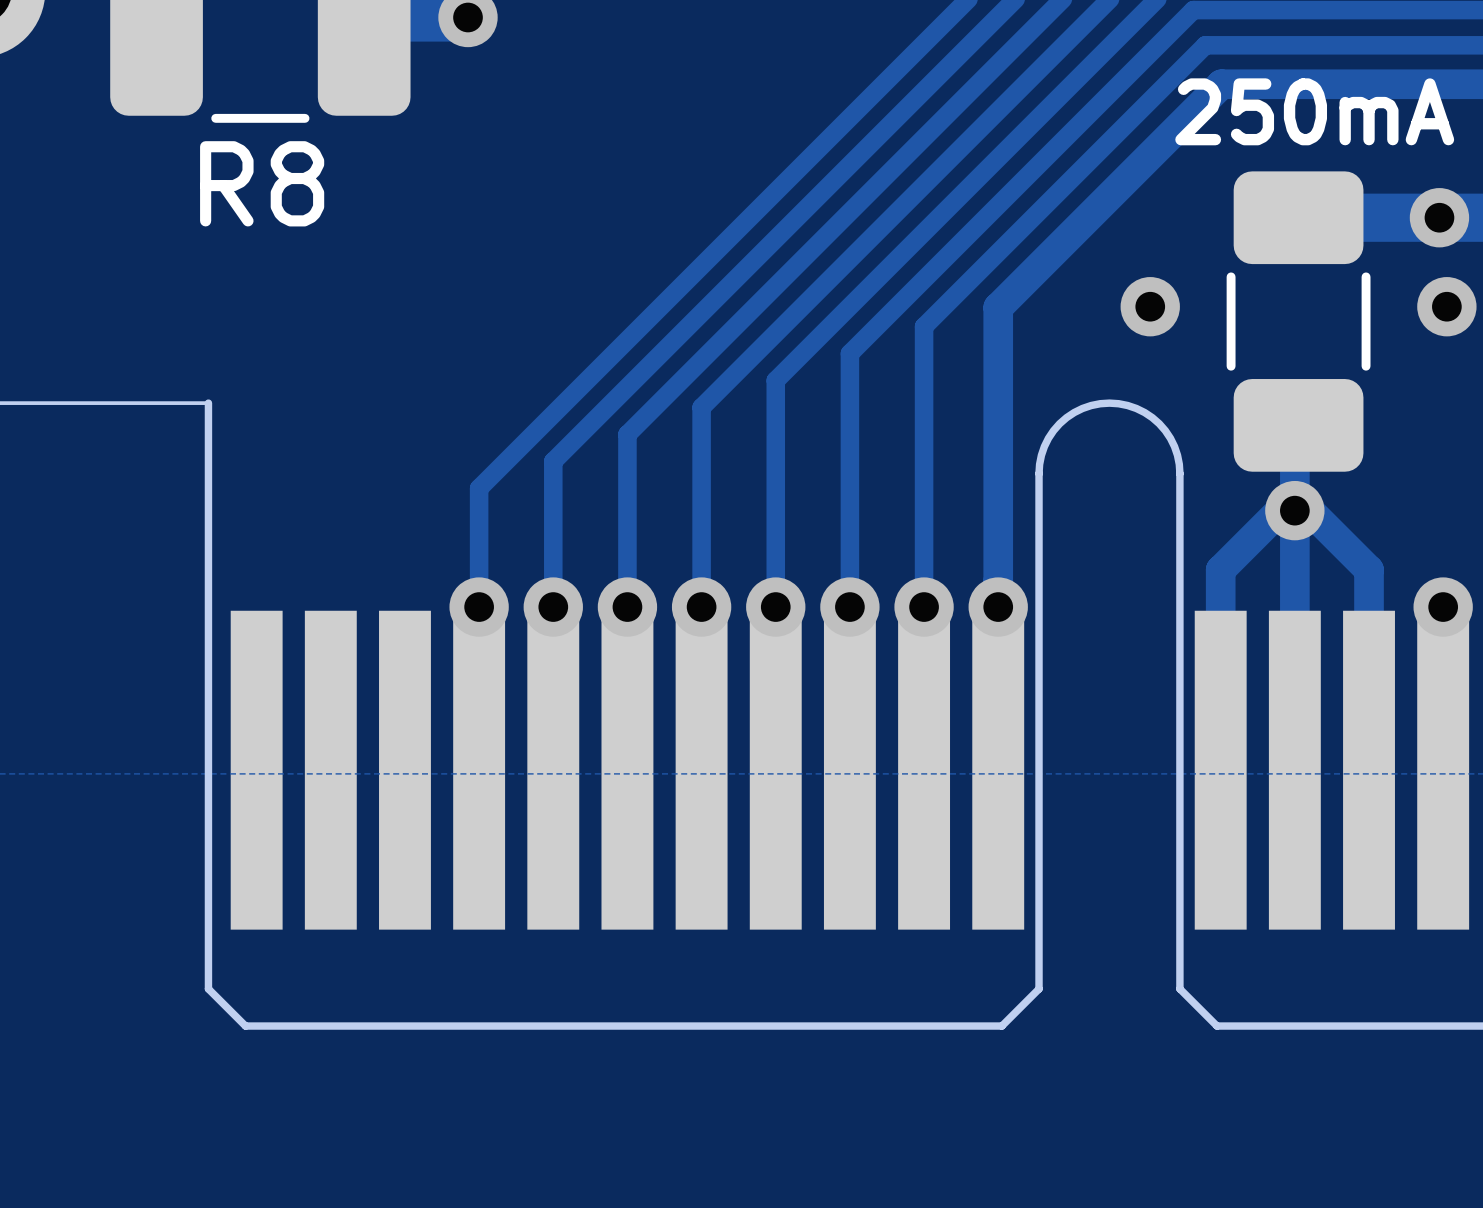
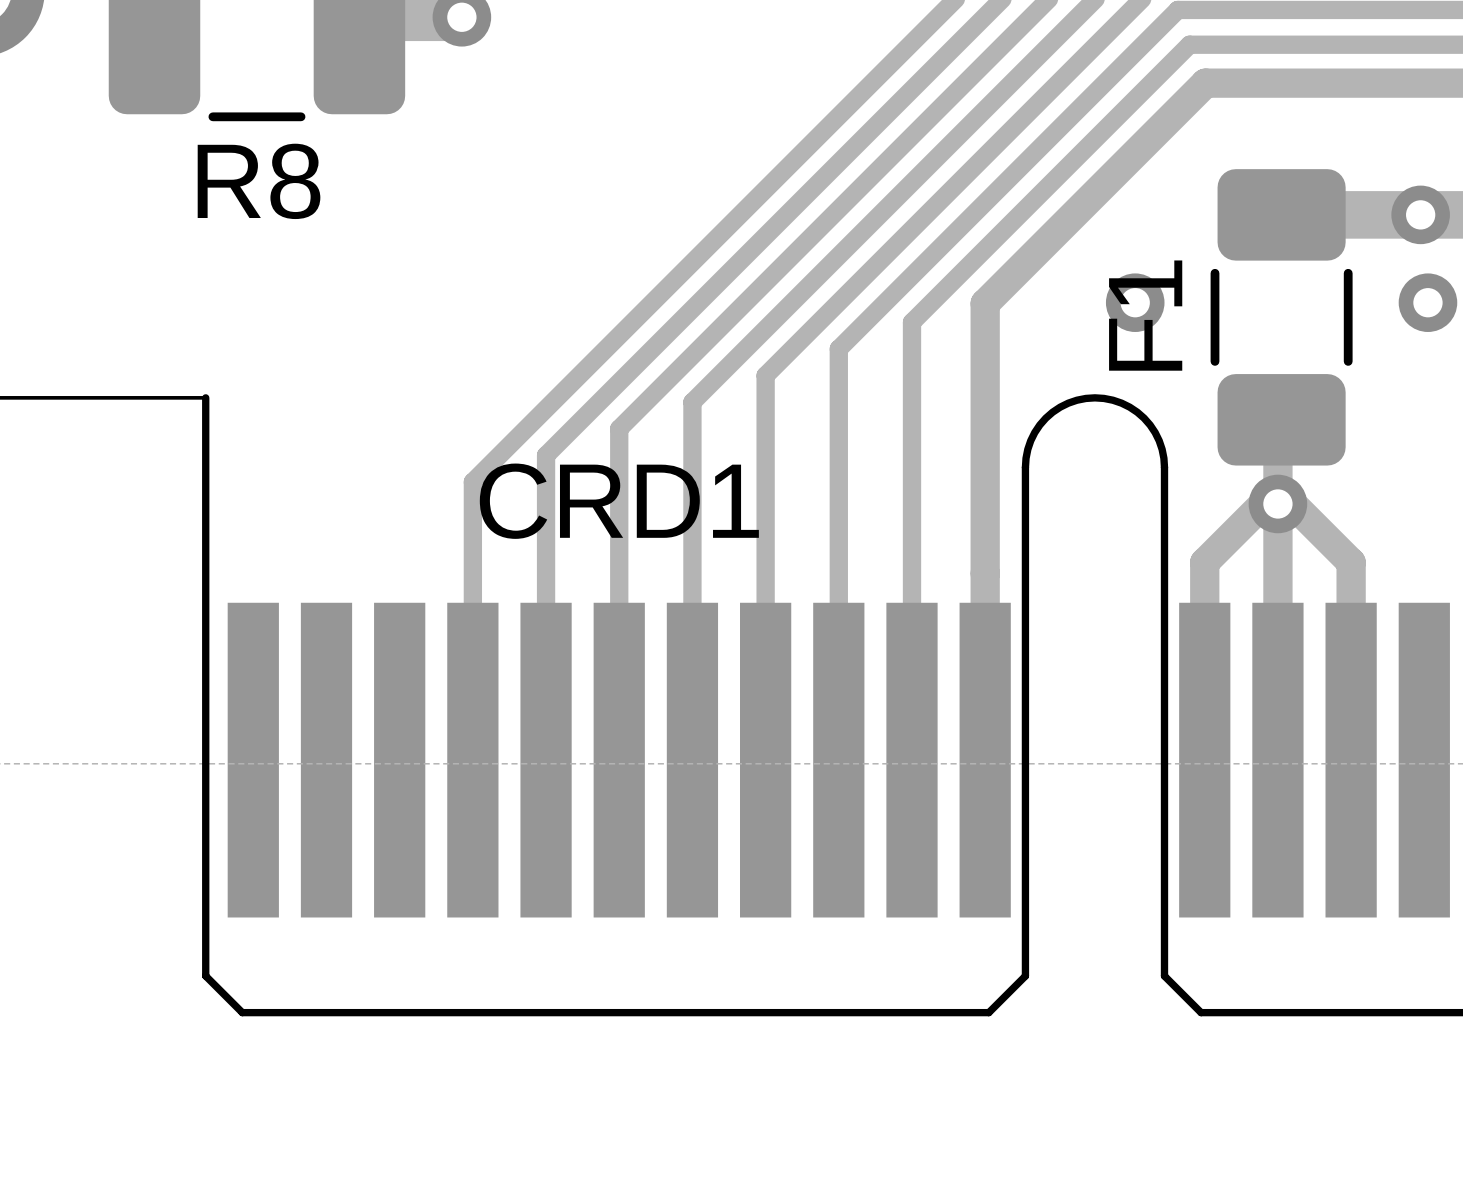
F1 value: 250mA (1314, 111) -> none
F1 name: none -> F1 (1145, 315)
CRD1 name: none -> CRD1 (619, 501)
via: (479, 607) -> none
via: (553, 607) -> none
via: (627, 607) -> none
via: (701, 607) -> none
via: (775, 607) -> none
via: (849, 607) -> none
via: (924, 607) -> none
via: (998, 607) -> none
via: (1443, 607) -> none

